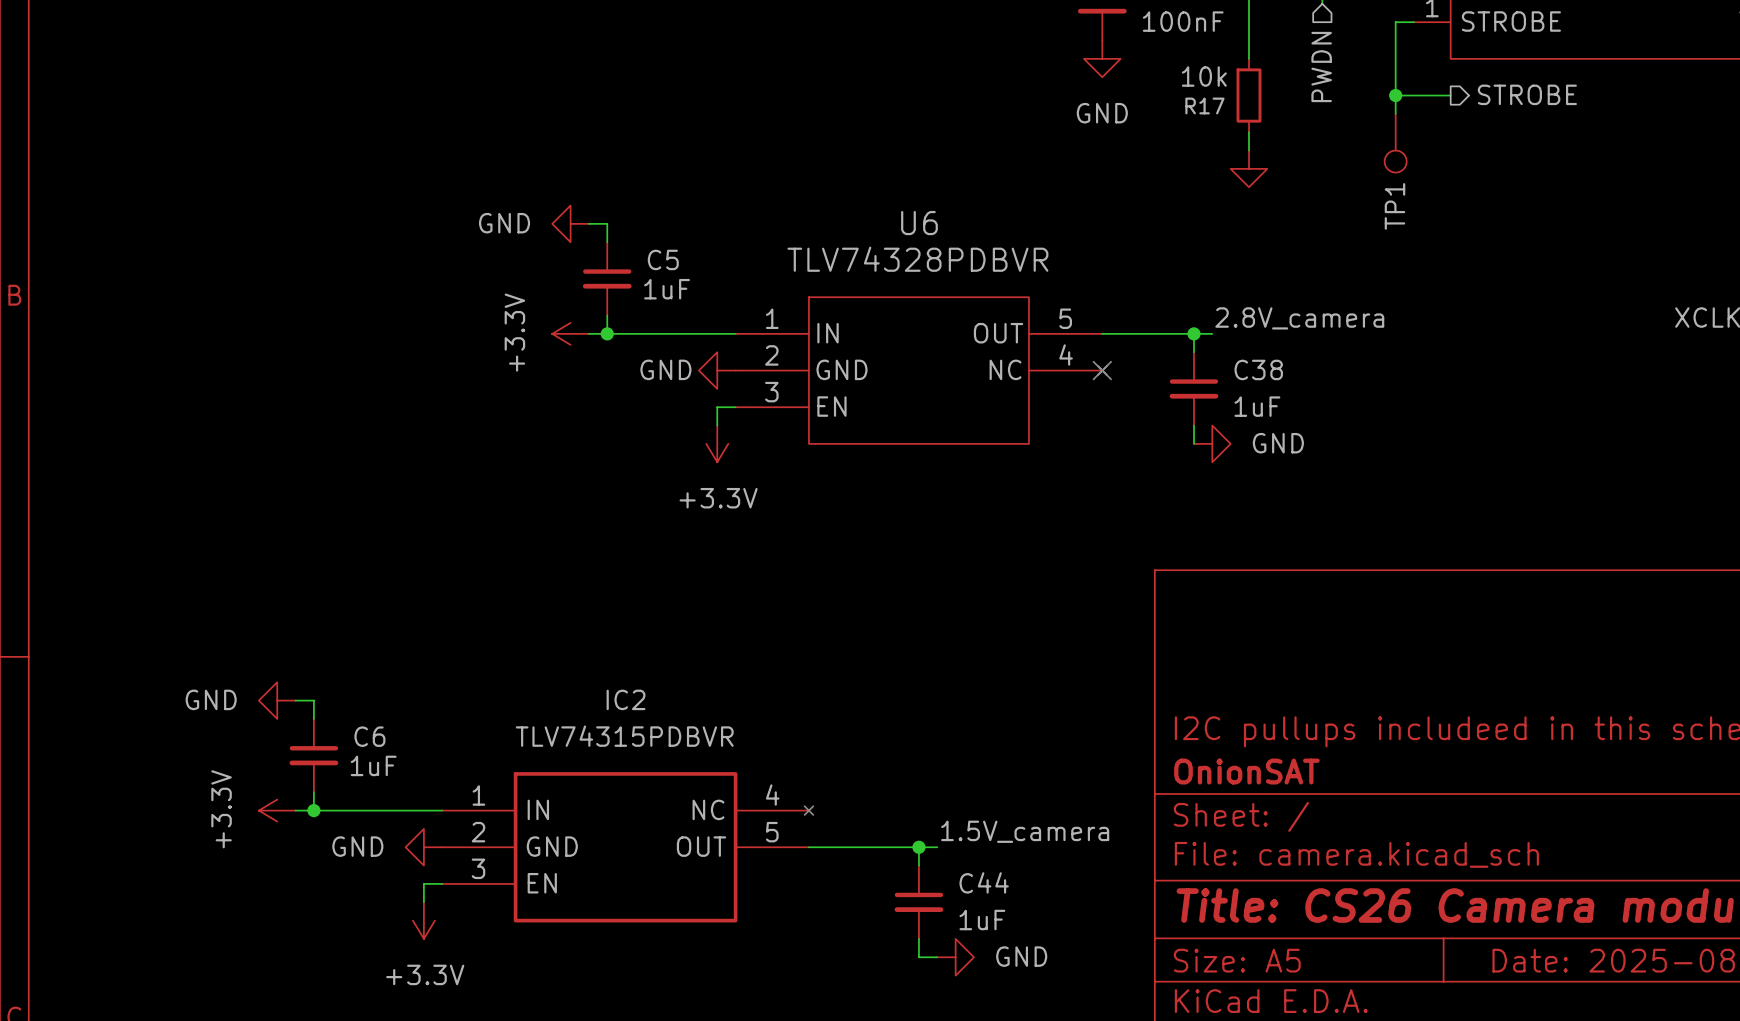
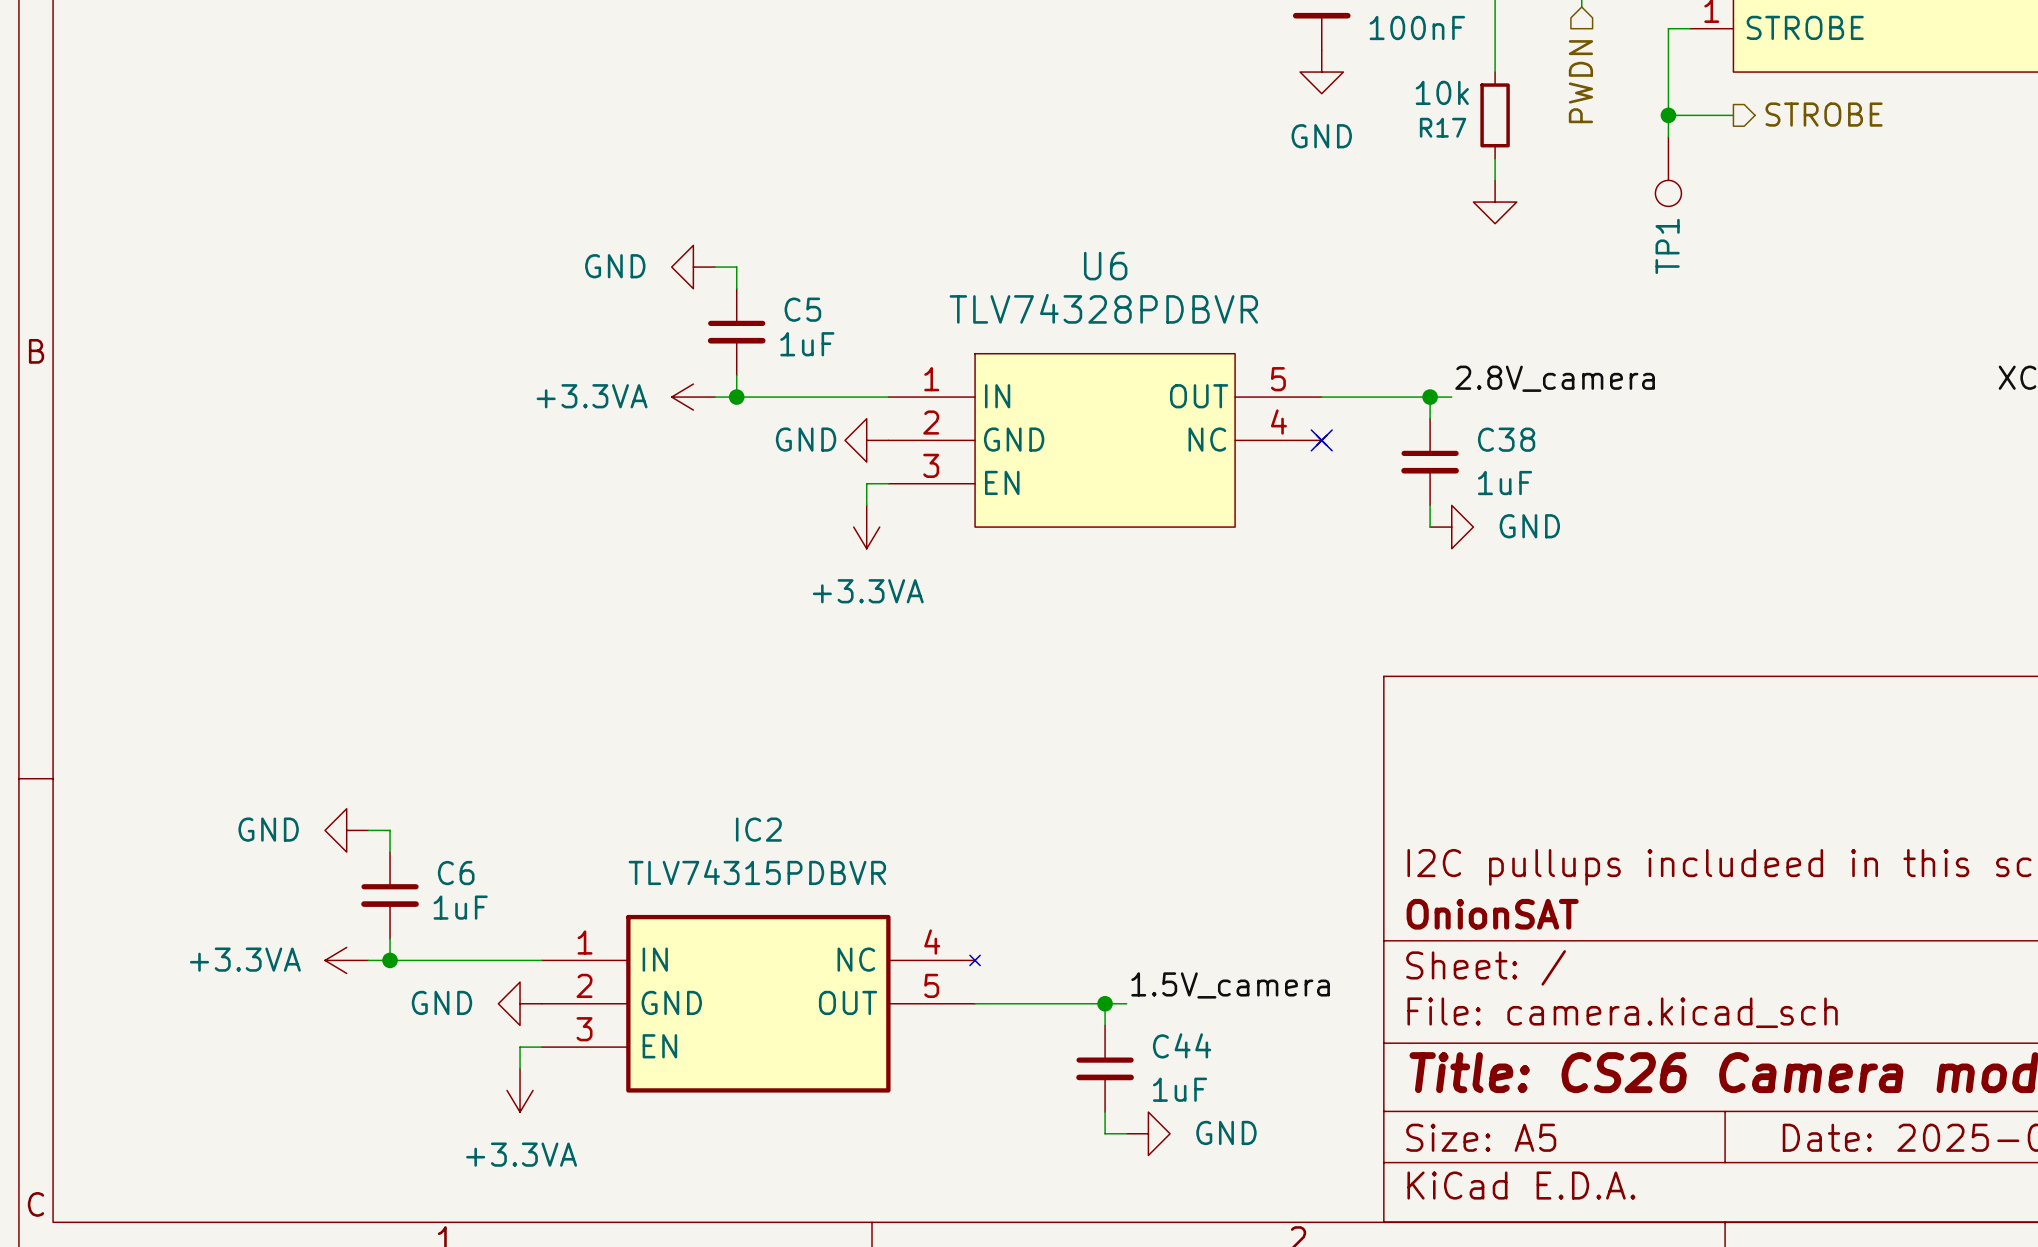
power symbol: +3.3V (570, 333) -> +3.3VA (693, 397)
power symbol: +3.3V (717, 443) -> +3.3VA (866, 527)
power symbol: +3.3V (277, 810) -> +3.3VA (346, 960)
power symbol: +3.3V (423, 920) -> +3.3VA (520, 1090)

